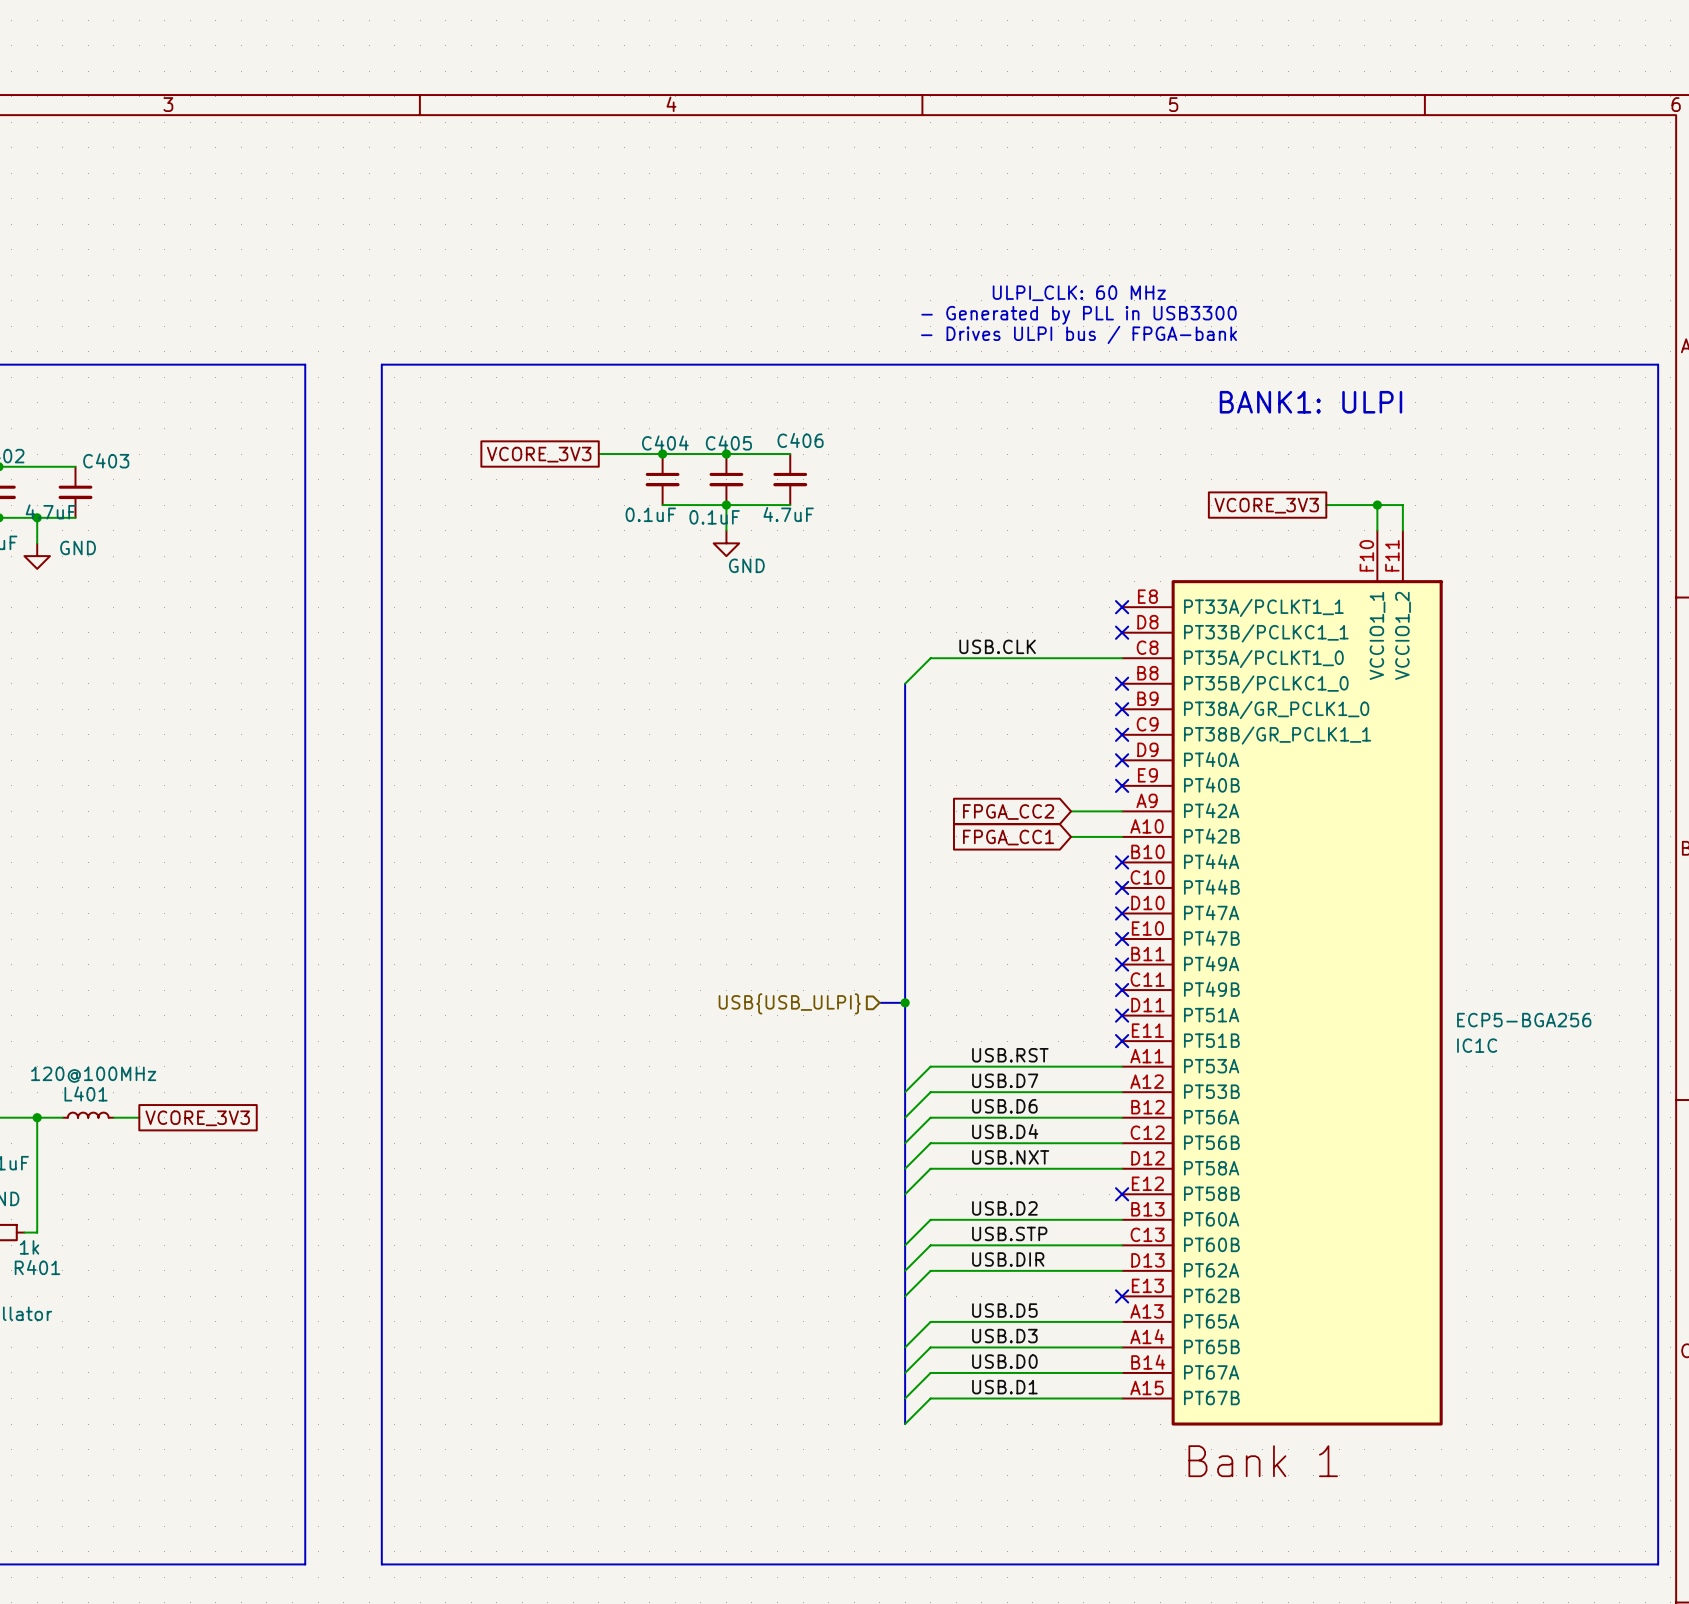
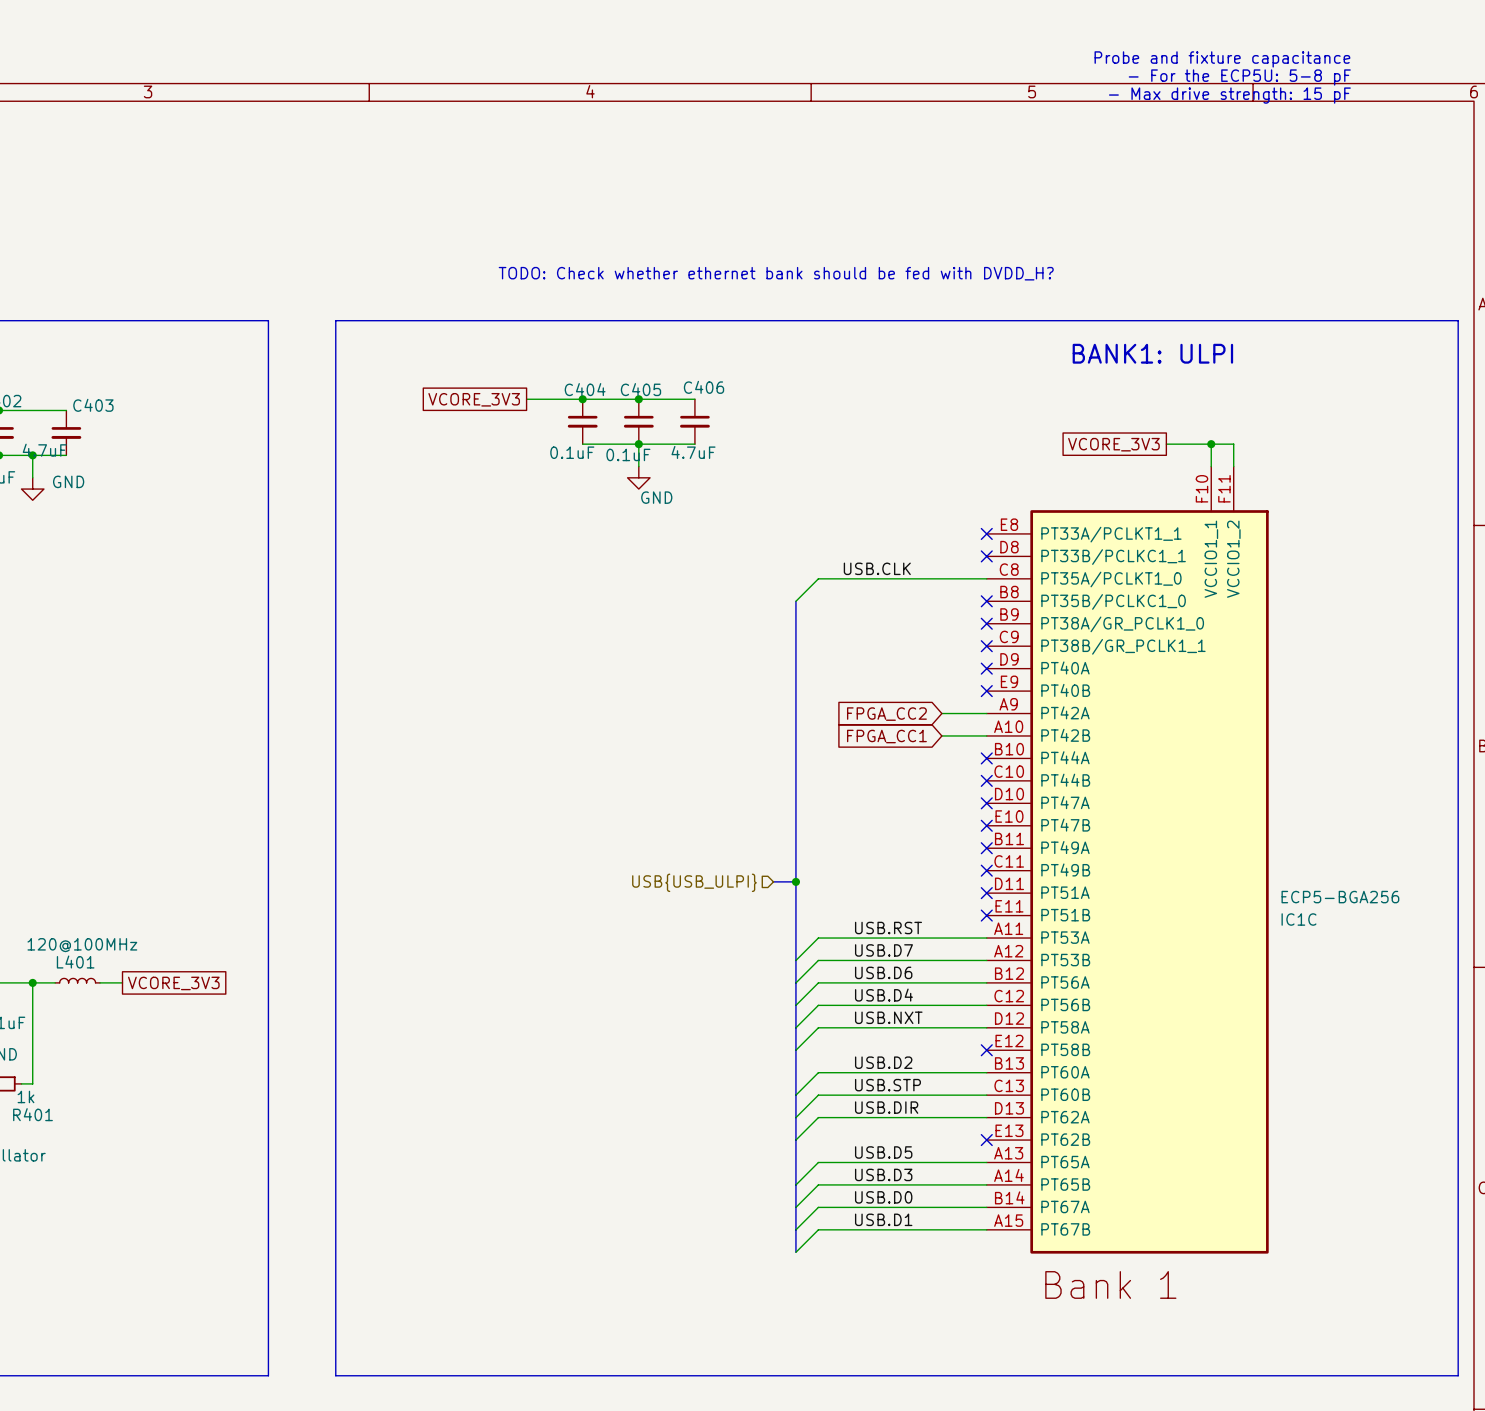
text: none -> Probe and fixture capacitance (1222, 59)
text: none -> - For the ECP5U: 5-8 pF (1239, 77)
text: none -> - Max drive strength: 15 pF (1229, 95)
text: ULPI_CLK: 60 MHz (1079, 293) -> none
text: none -> TODO: Check whether ethernet bank should be fed with DVDD_H? (776, 273)
text: - Generated by PLL in USB3300 (1079, 315) -> none
text: - Drives ULPI bus / FPGA-bank (1079, 334) -> none

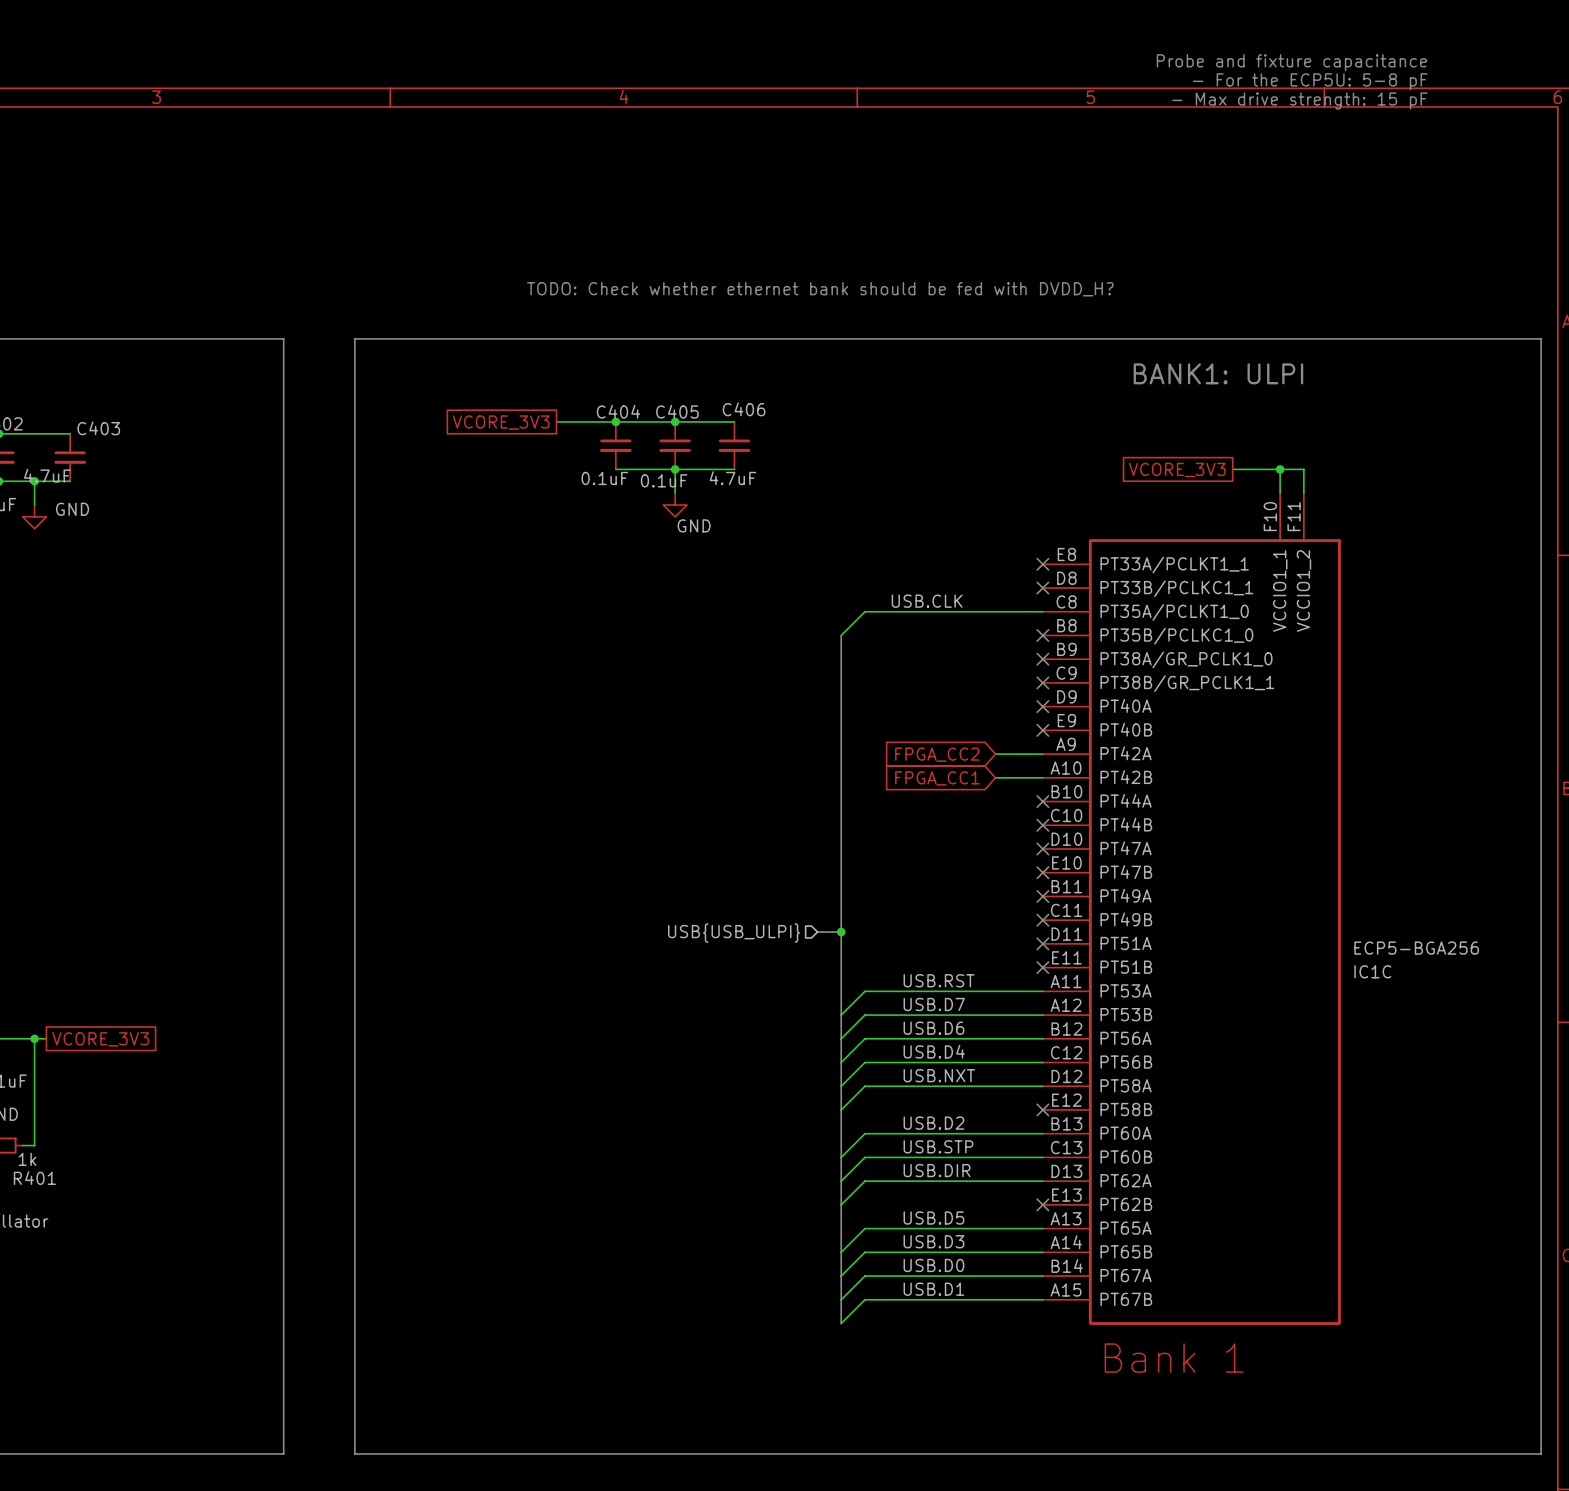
L401: 120@100MHz (77, 980) -> none
wire: (43, 982) (55, 982) -> none
wire: (100, 982) (122, 982) -> none
global label position: VCORE_3V3 (173, 983) -> VCORE_3V3 (100, 1039)

